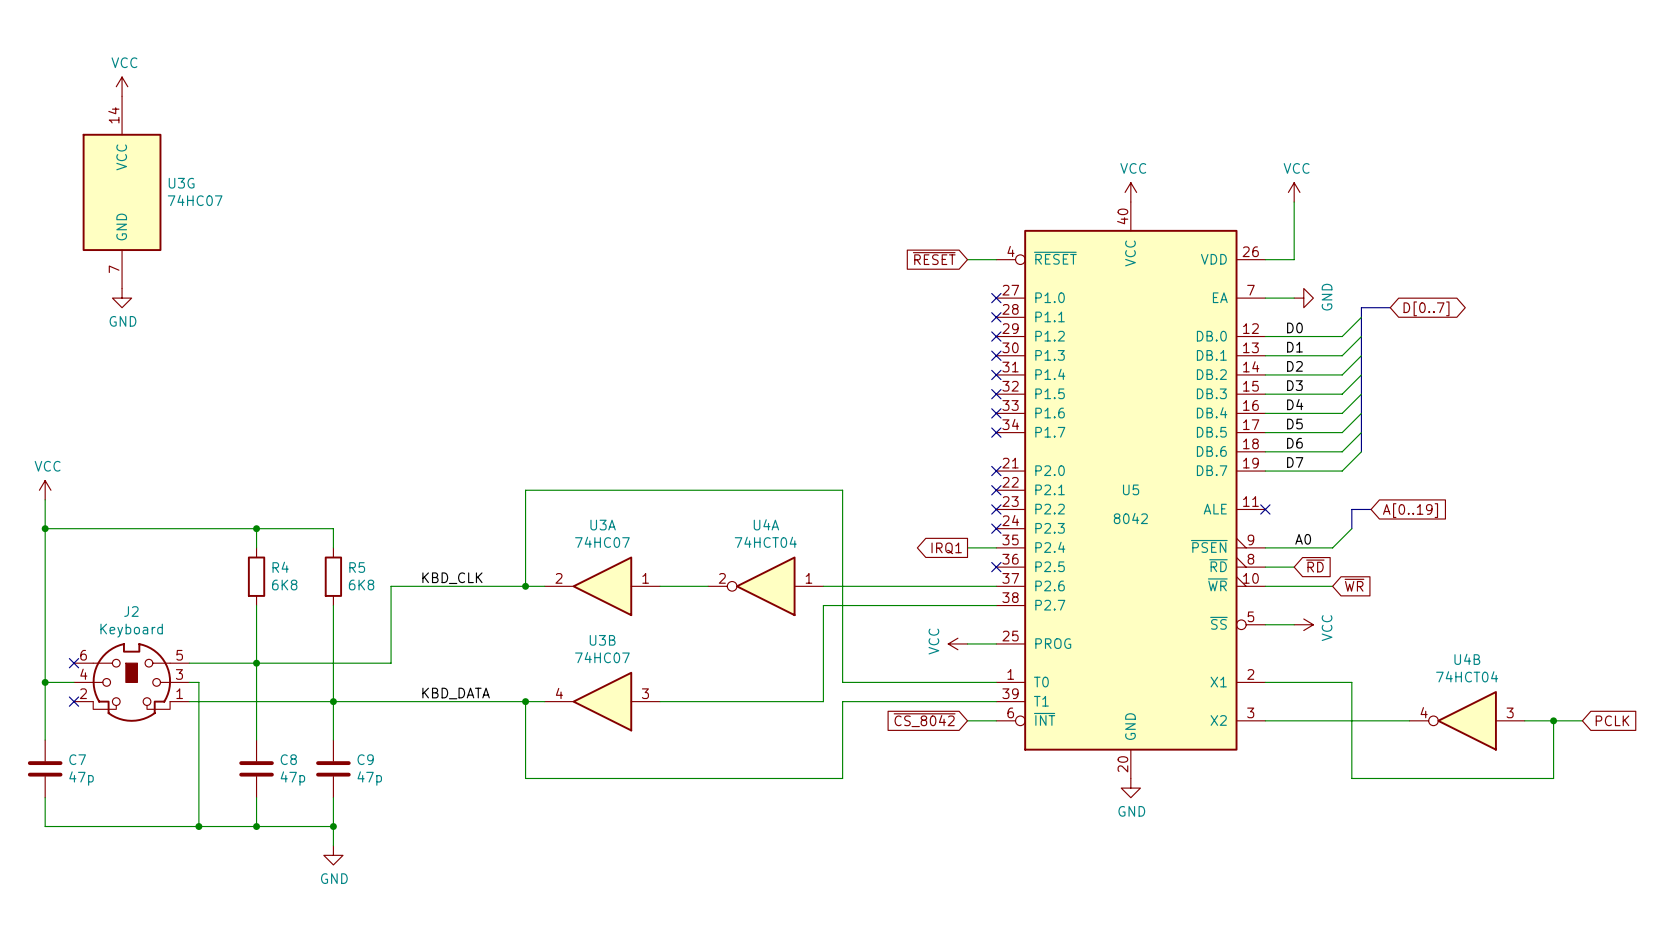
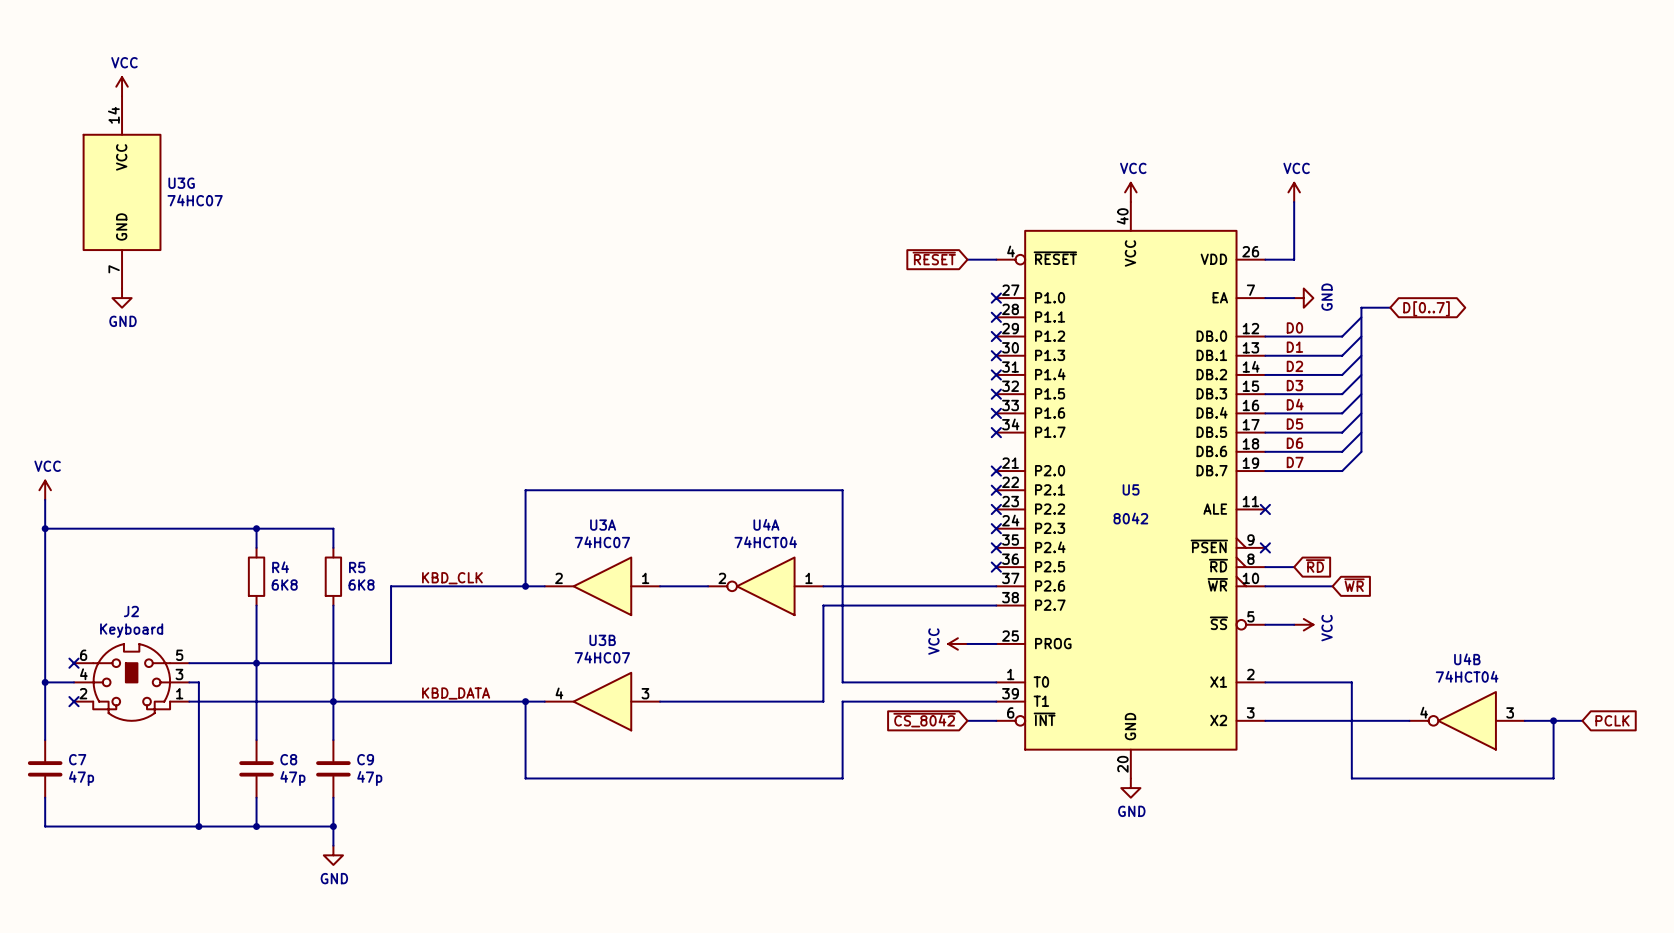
bus: (1371, 509) (1351, 509) (1351, 528) -> none
global label: A[0..19] (1410, 510) -> none
wire: (1351, 528) (1332, 547) (1265, 547) -> none
label: A0 (1303, 539) -> none
wire: (967, 547) (996, 547) -> none
no-connect mark: none -> (996, 547)
no-connect mark: none -> (1265, 547)
global label: IRQ1 (946, 548) -> none

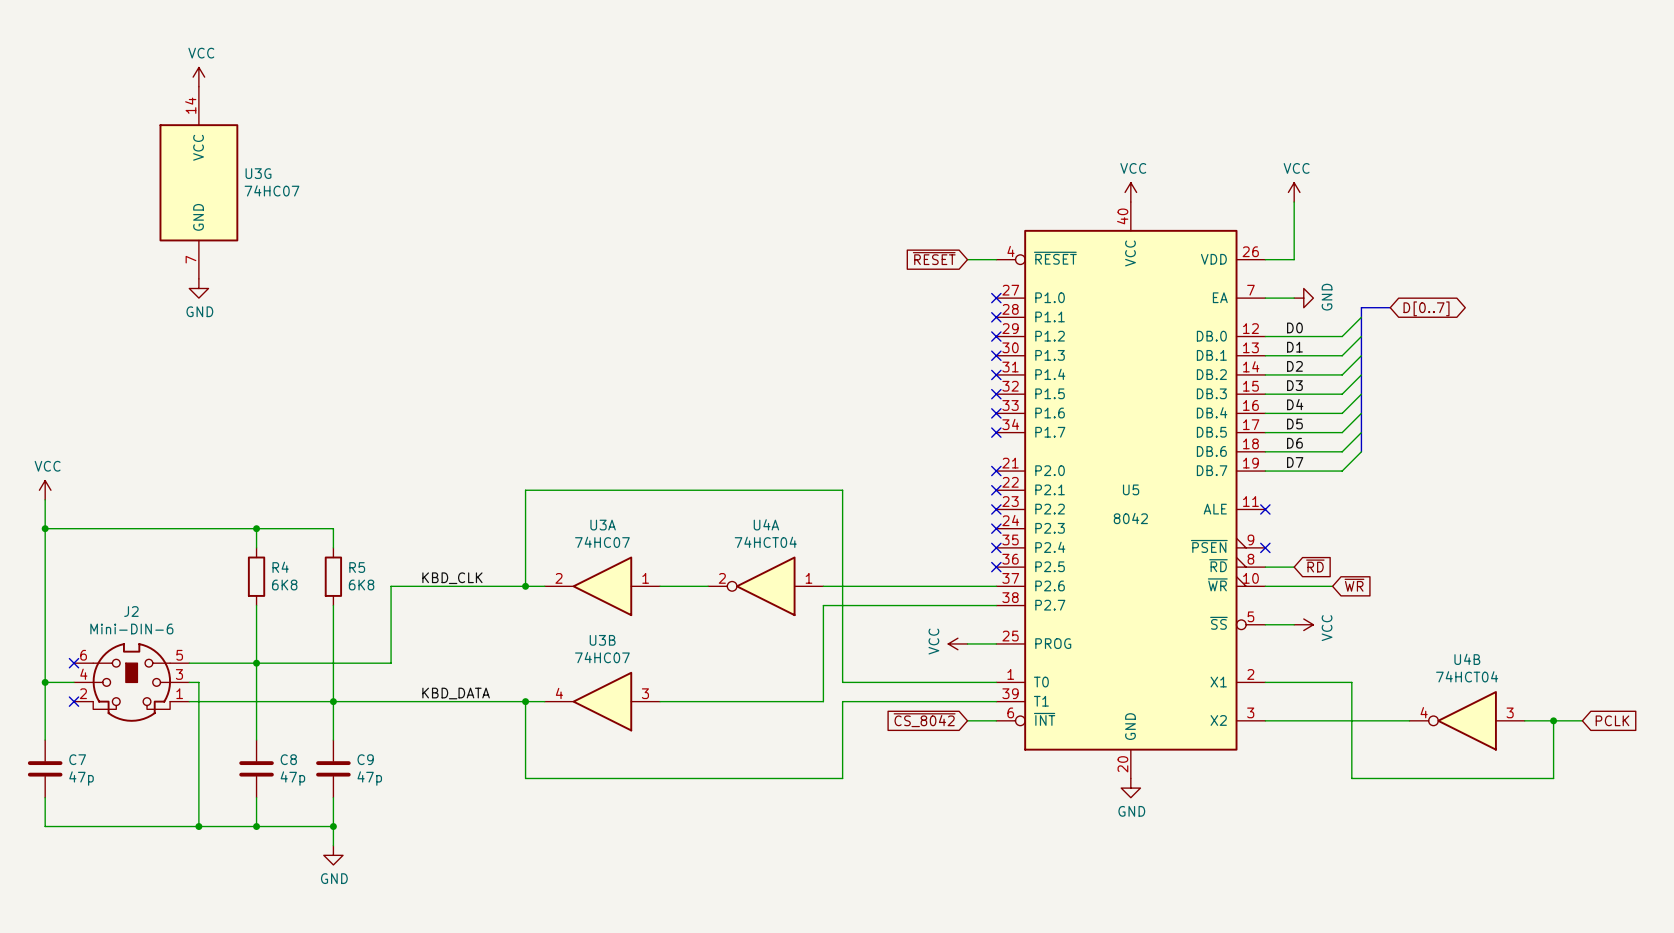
power symbol position: VCC (122, 86) -> VCC (198, 77)
U3G position: (122, 192) -> (198, 182)
power symbol position: GND (122, 298) -> GND (198, 288)
J2 value: Keyboard (131, 630) -> Mini-DIN-6 (131, 629)

